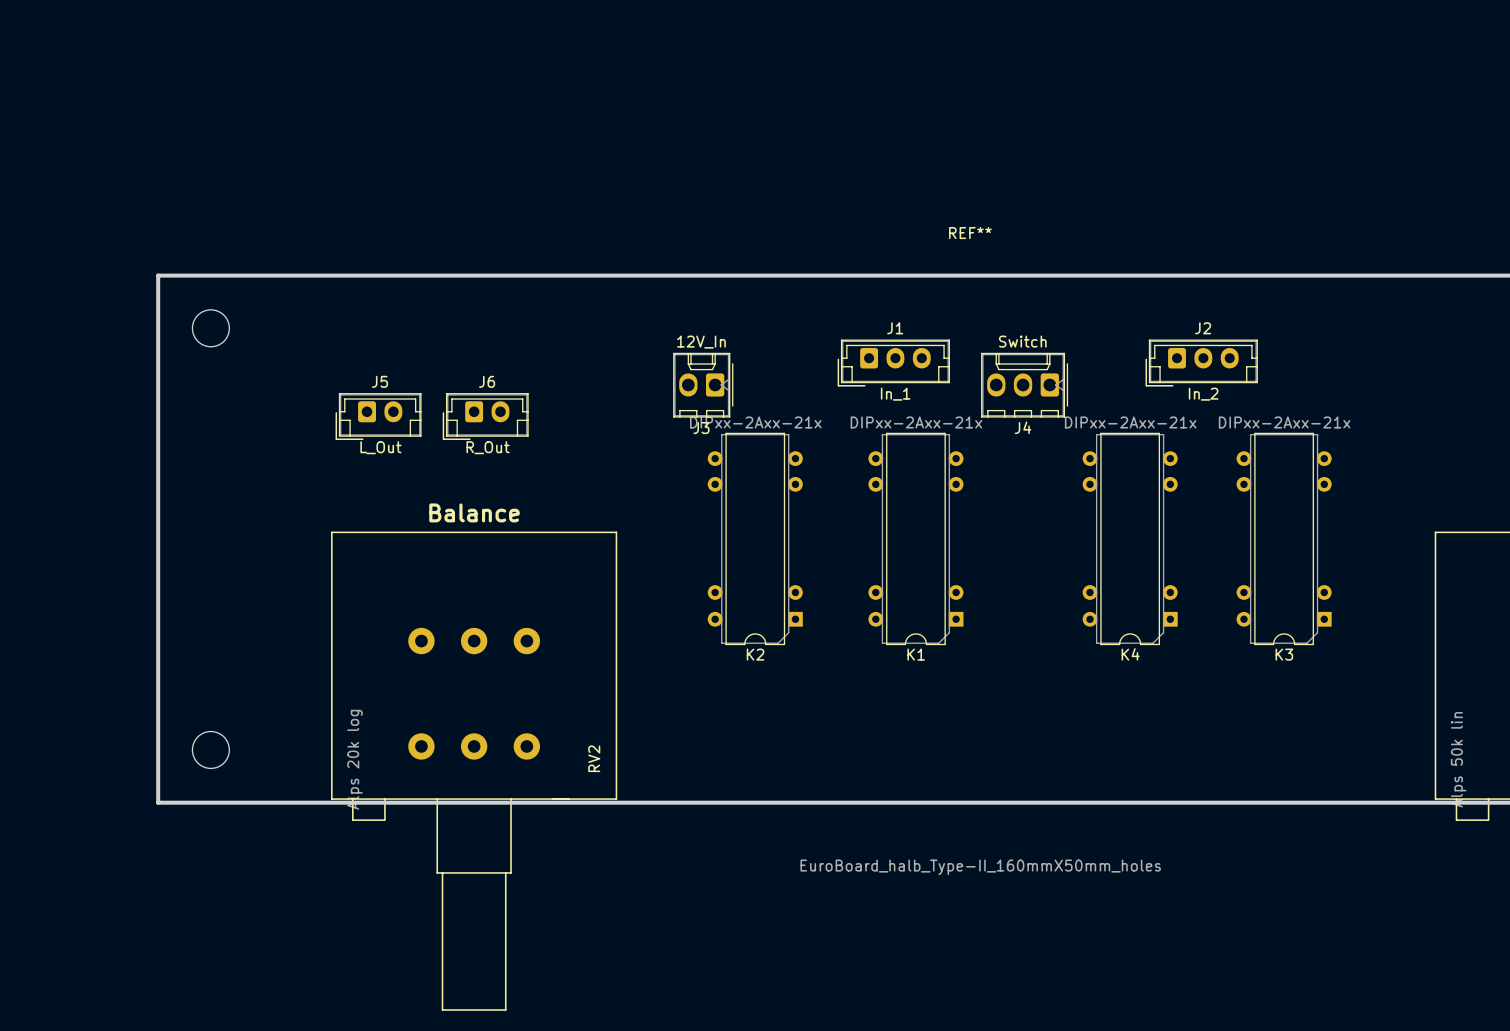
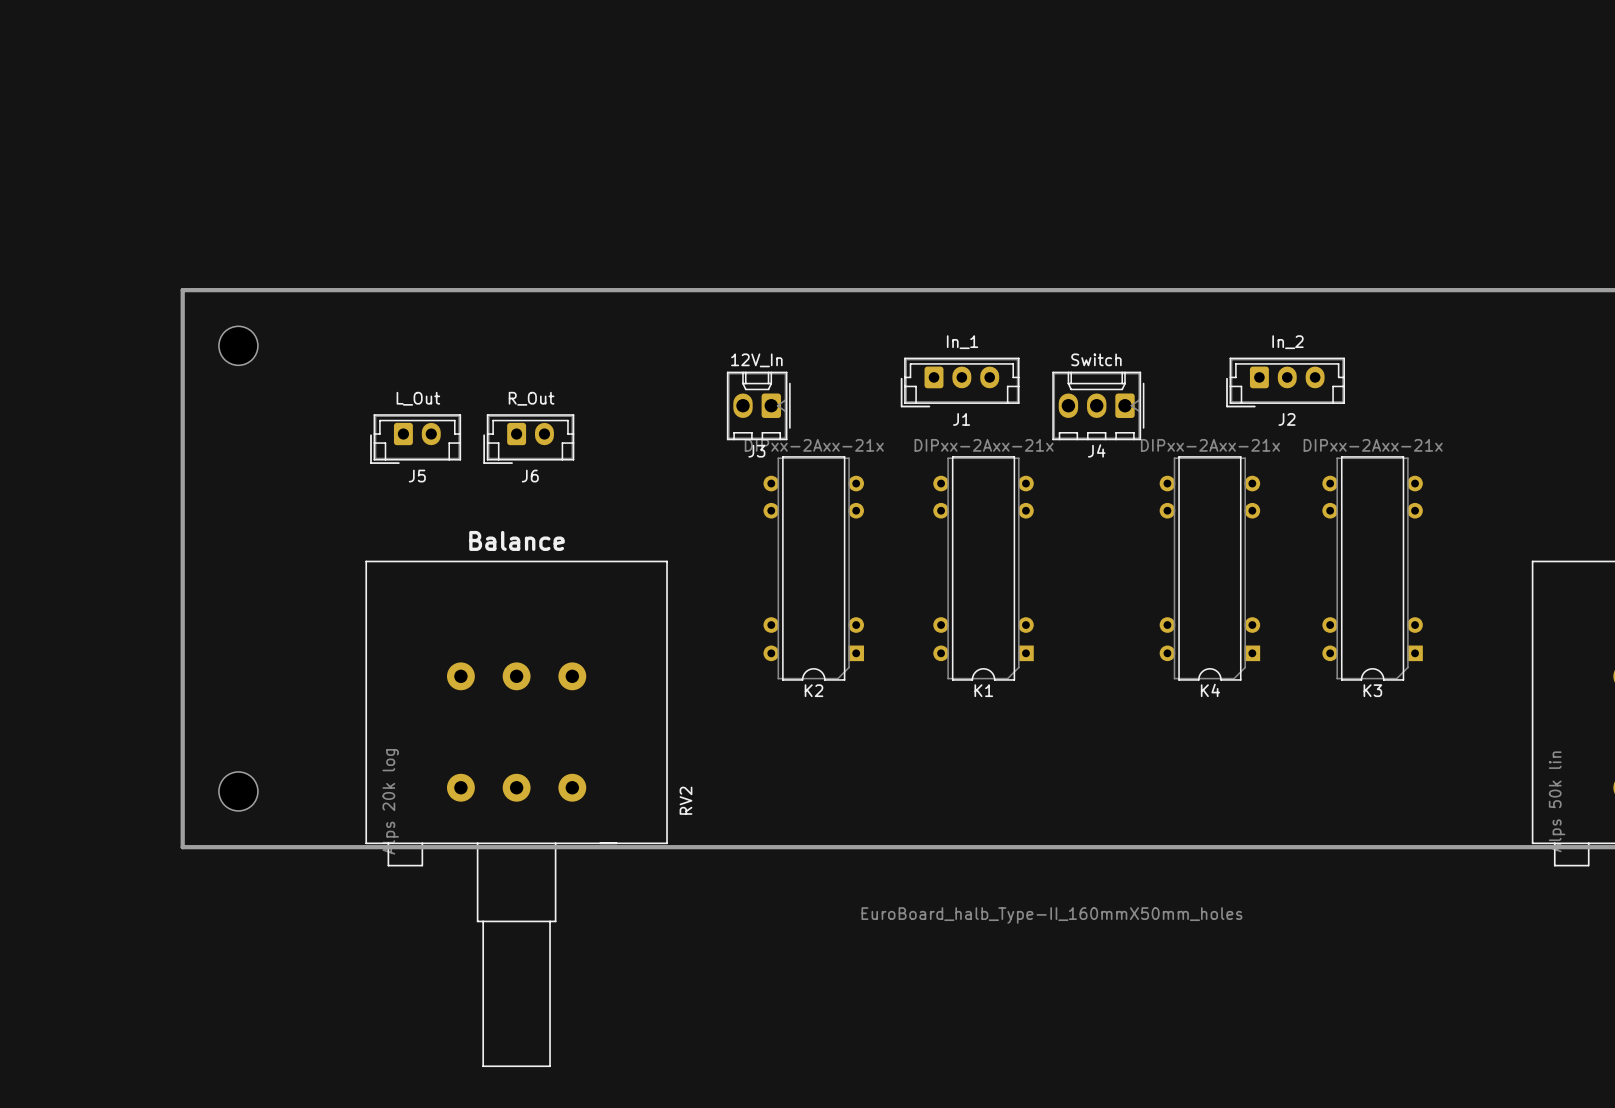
REF** name: REF** (970, 233) -> none
J1 name position: J1 (895, 328) -> J1 (961, 419)
J2 name position: J2 (1203, 328) -> J2 (1287, 419)
J5 name position: J5 (379, 381) -> J5 (417, 476)
J6 name position: J6 (487, 381) -> J6 (530, 476)
J1 value position: In_1 (895, 394) -> In_1 (962, 342)
J2 value position: In_2 (1203, 394) -> In_2 (1287, 342)
J5 value position: L_Out (380, 447) -> L_Out (418, 398)
J6 value position: R_Out (488, 447) -> R_Out (531, 398)
RV2 name position: RV2 (594, 758) -> RV2 (685, 800)

